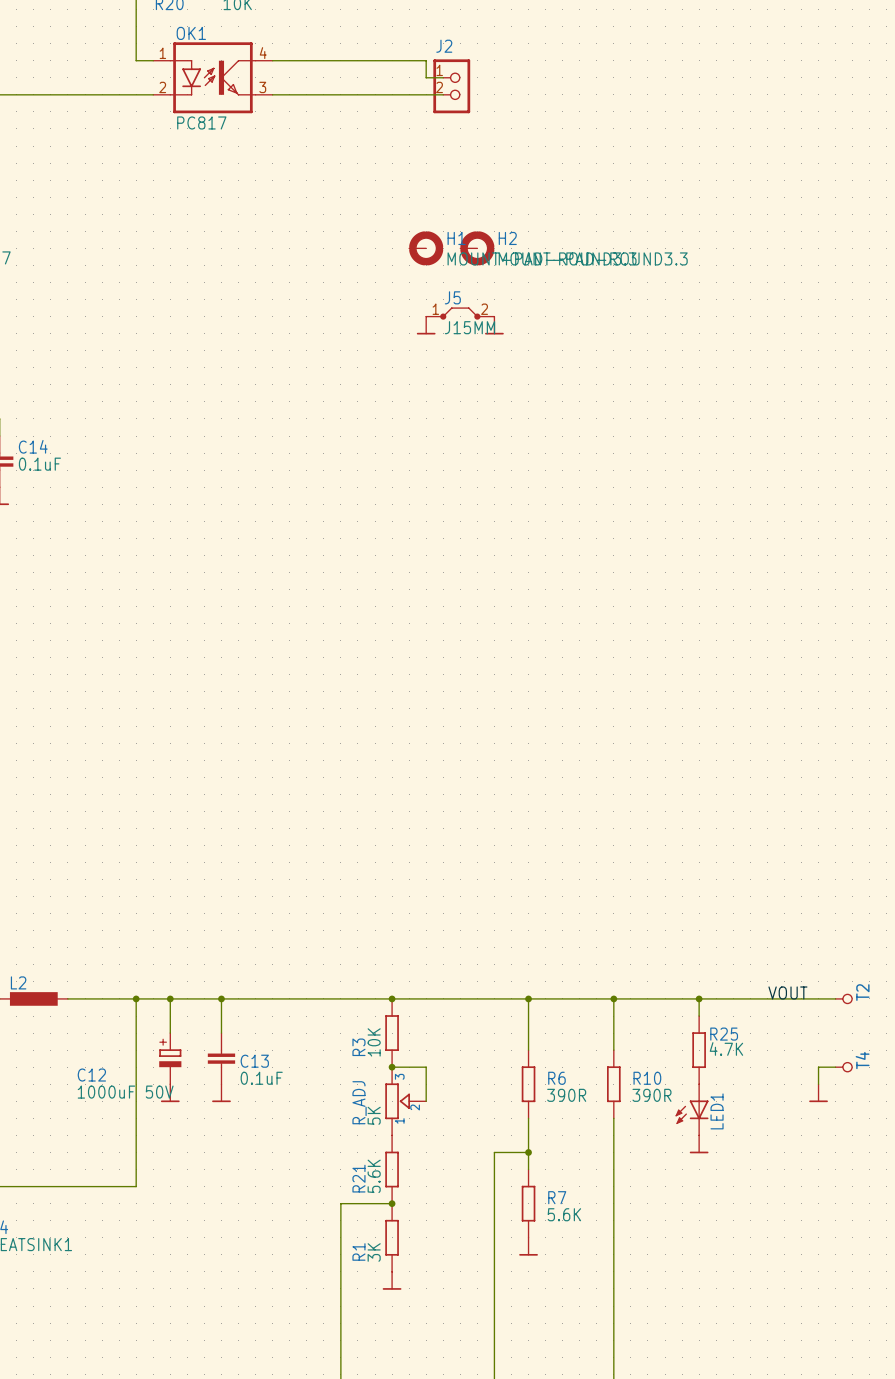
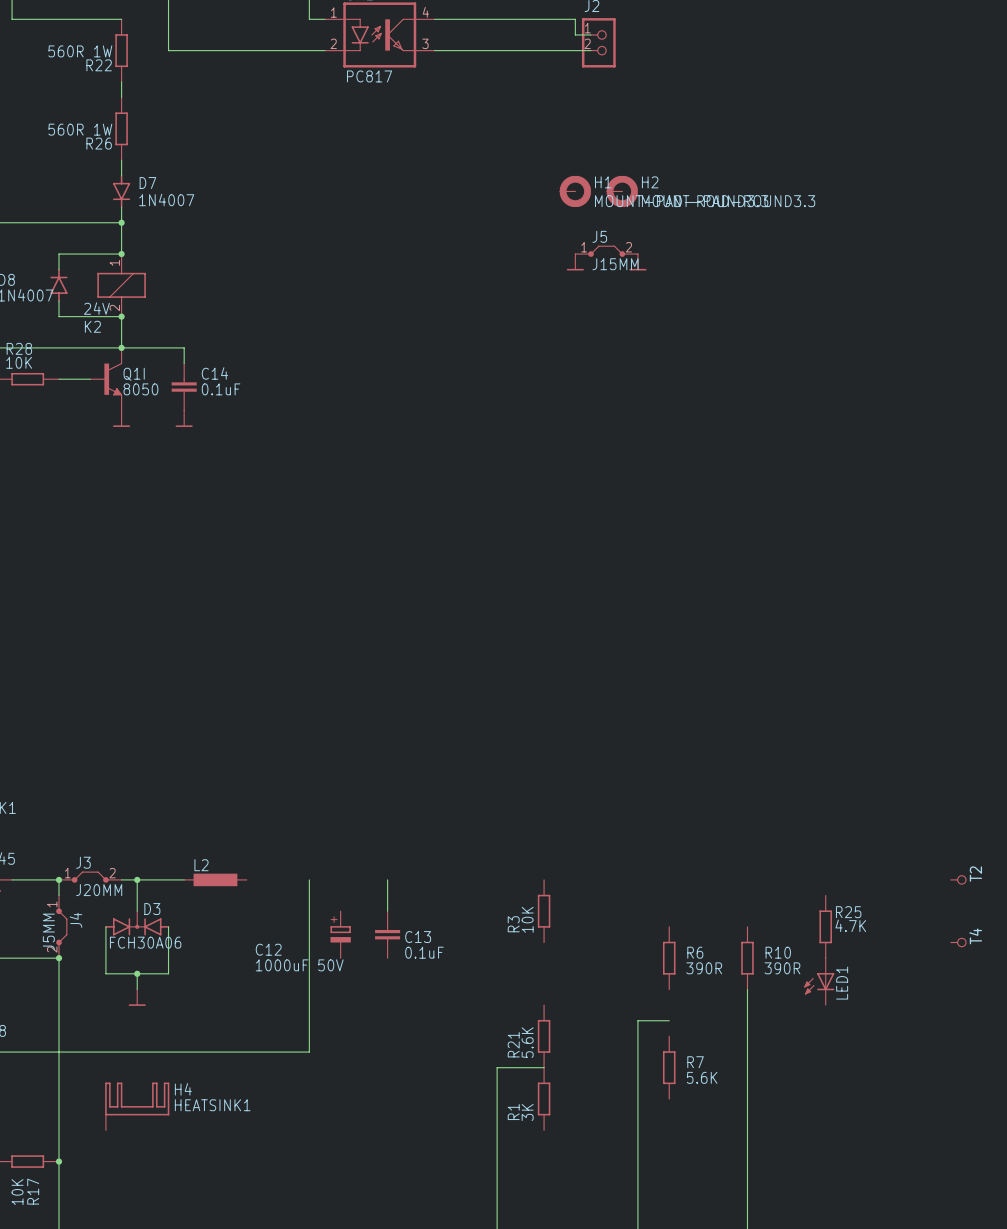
label: VOUT (787, 992) -> none
wire: (67, 998) (835, 998) -> none
junction: (136, 998) -> none
wire: (170, 998) (170, 1033) -> none
junction: (170, 998) -> none
junction: (221, 998) -> none
junction: (392, 998) -> none
wire: (528, 998) (528, 1050) -> none
junction: (528, 998) -> none
wire: (613, 998) (613, 1050) -> none
junction: (613, 998) -> none
wire: (699, 998) (699, 1016) -> none
junction: (699, 998) -> none
wire: (392, 1067) (426, 1067) (426, 1101) -> none
junction: (392, 1067) -> none
wire: (835, 1067) (818, 1067) (818, 1084) -> none
power symbol: (170, 1093) -> none
power symbol: (221, 1093) -> none
power symbol: (818, 1093) -> none
R_ADJ: 5K (405, 1101) -> none
wire: (528, 1118) (528, 1169) -> none
power symbol: (699, 1144) -> none
junction: (528, 1152) -> none
junction: (392, 1203) -> none
power symbol: (528, 1246) -> none
power symbol: (392, 1280) -> none

